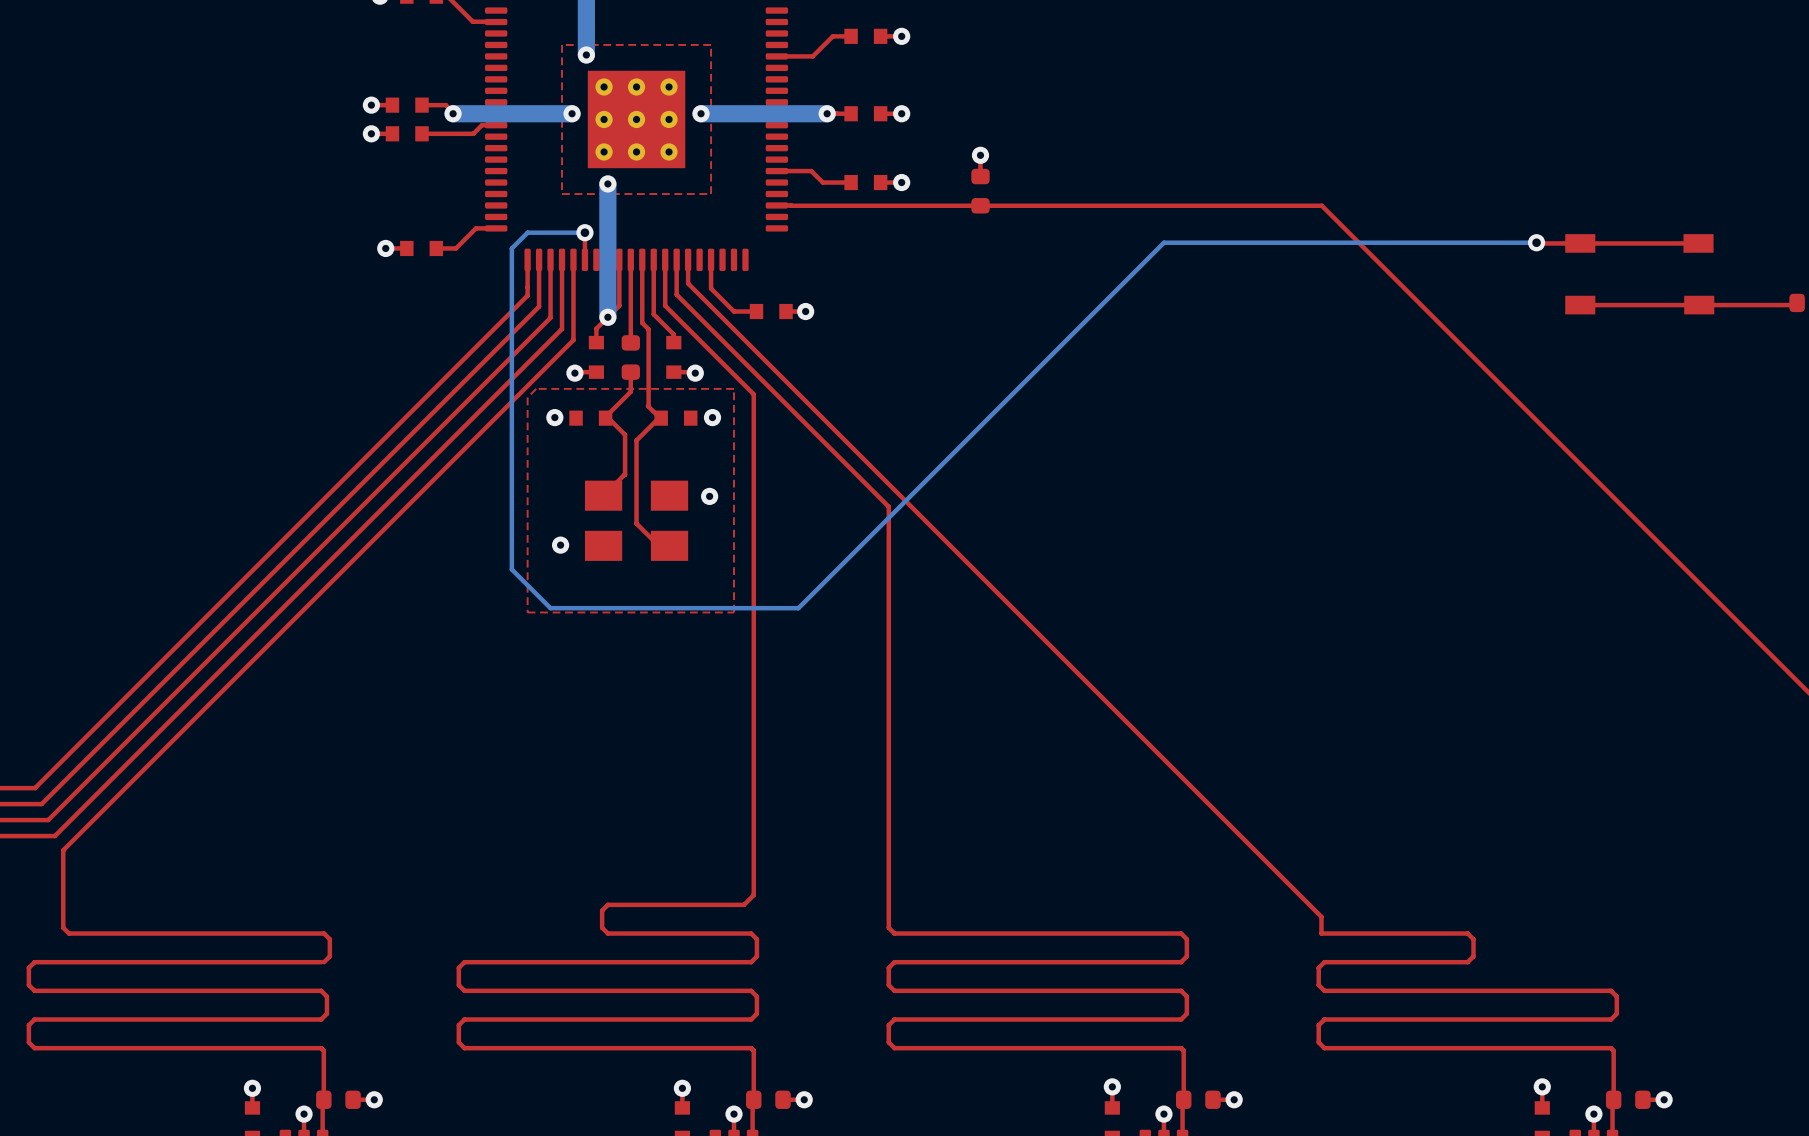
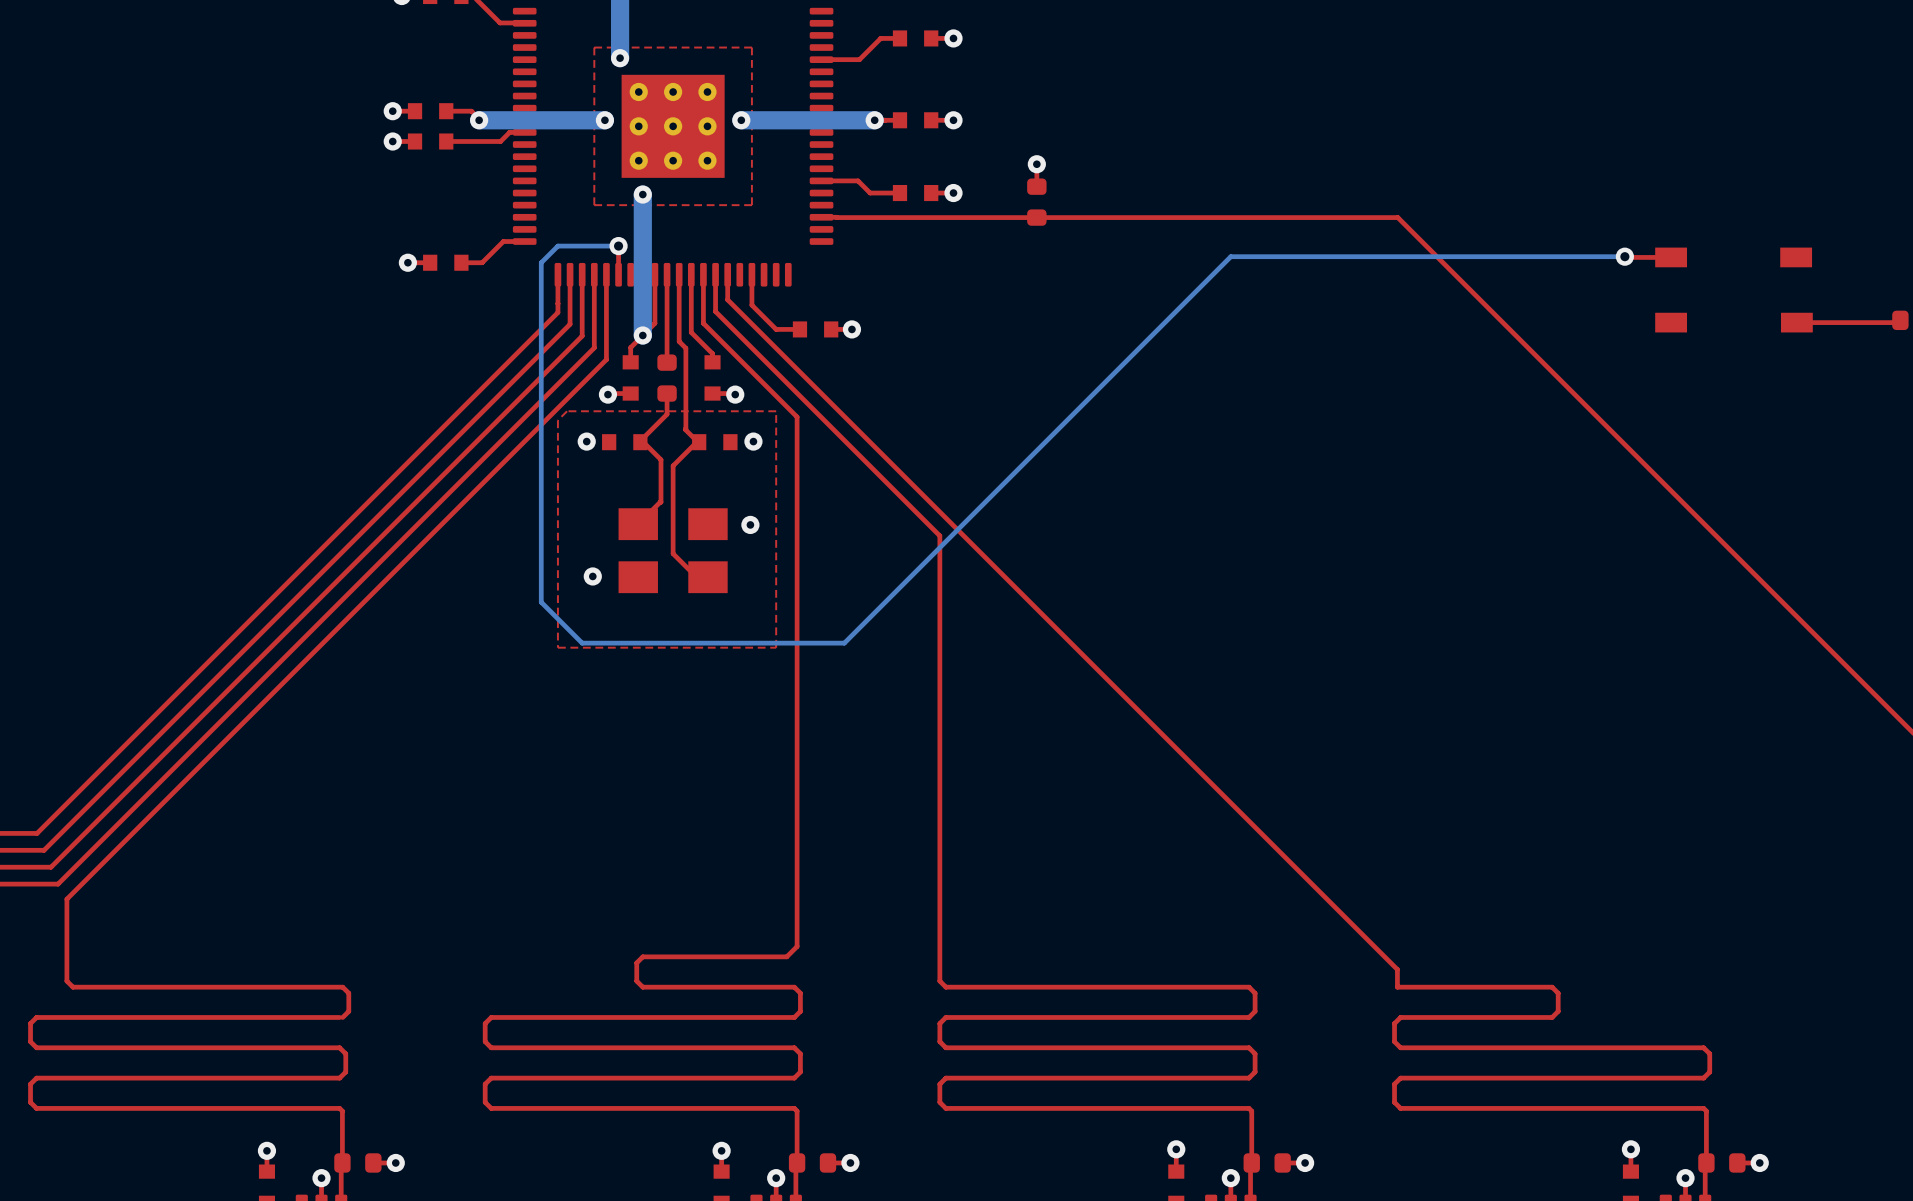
top track: (1698, 243) (1580, 243) -> none
top track: (1699, 305) (1580, 305) -> none

